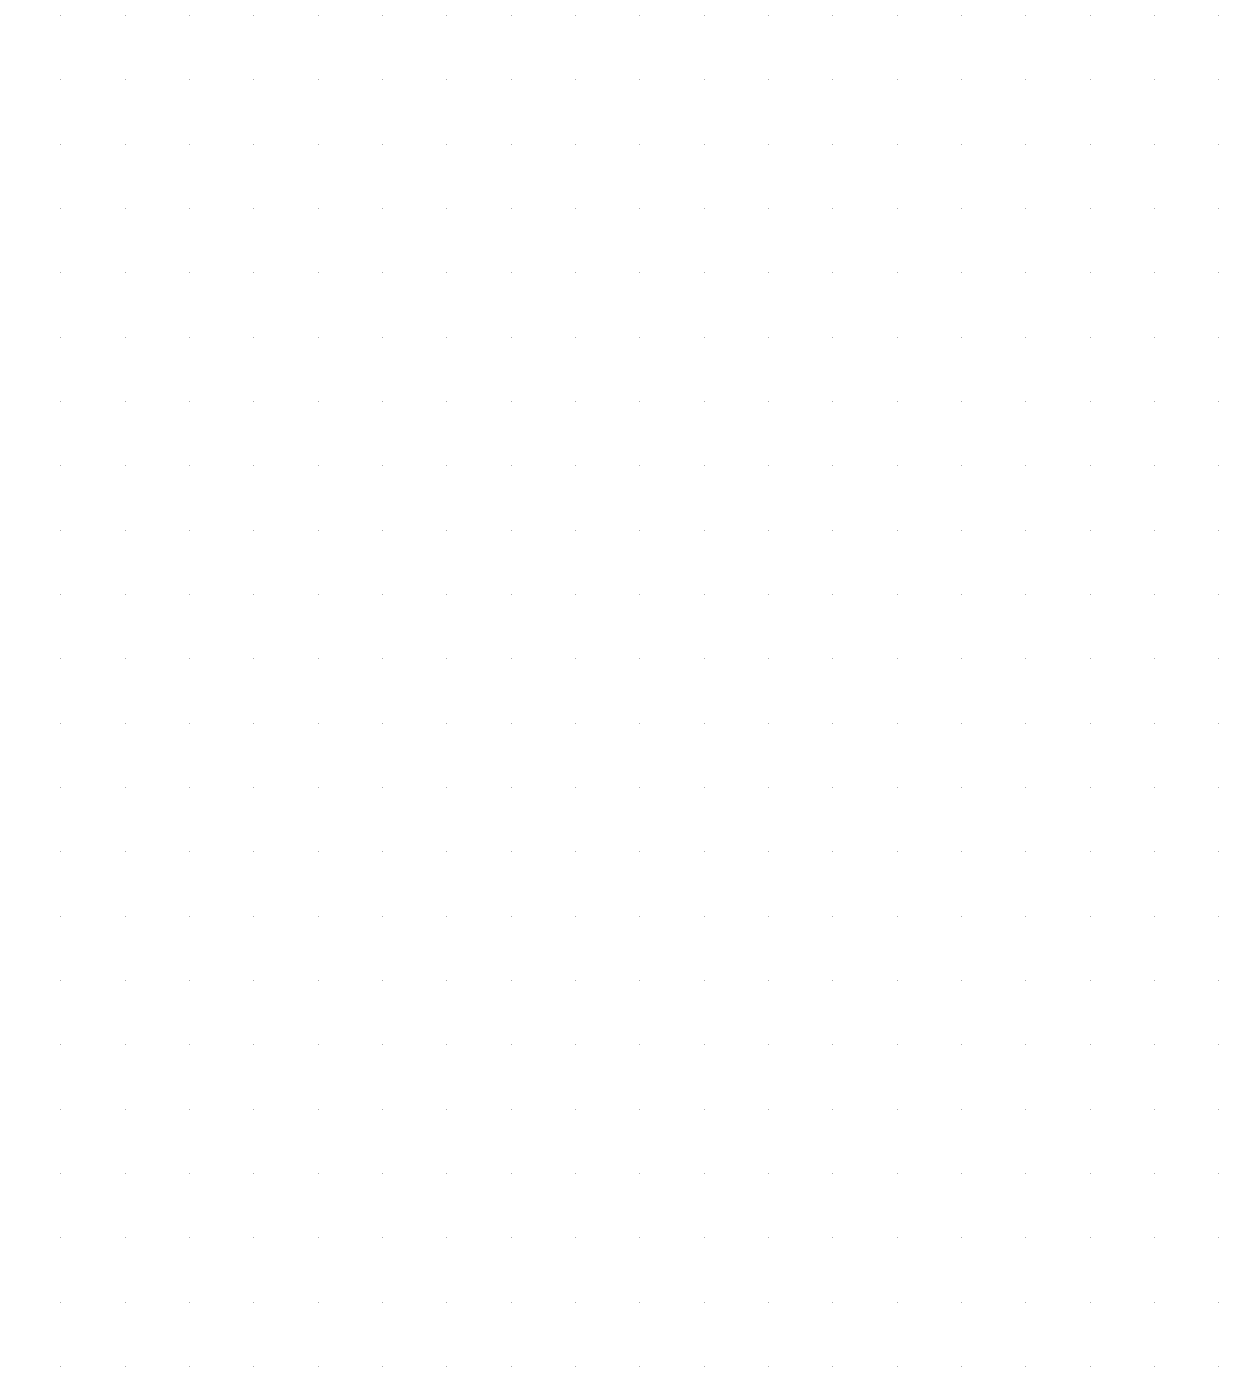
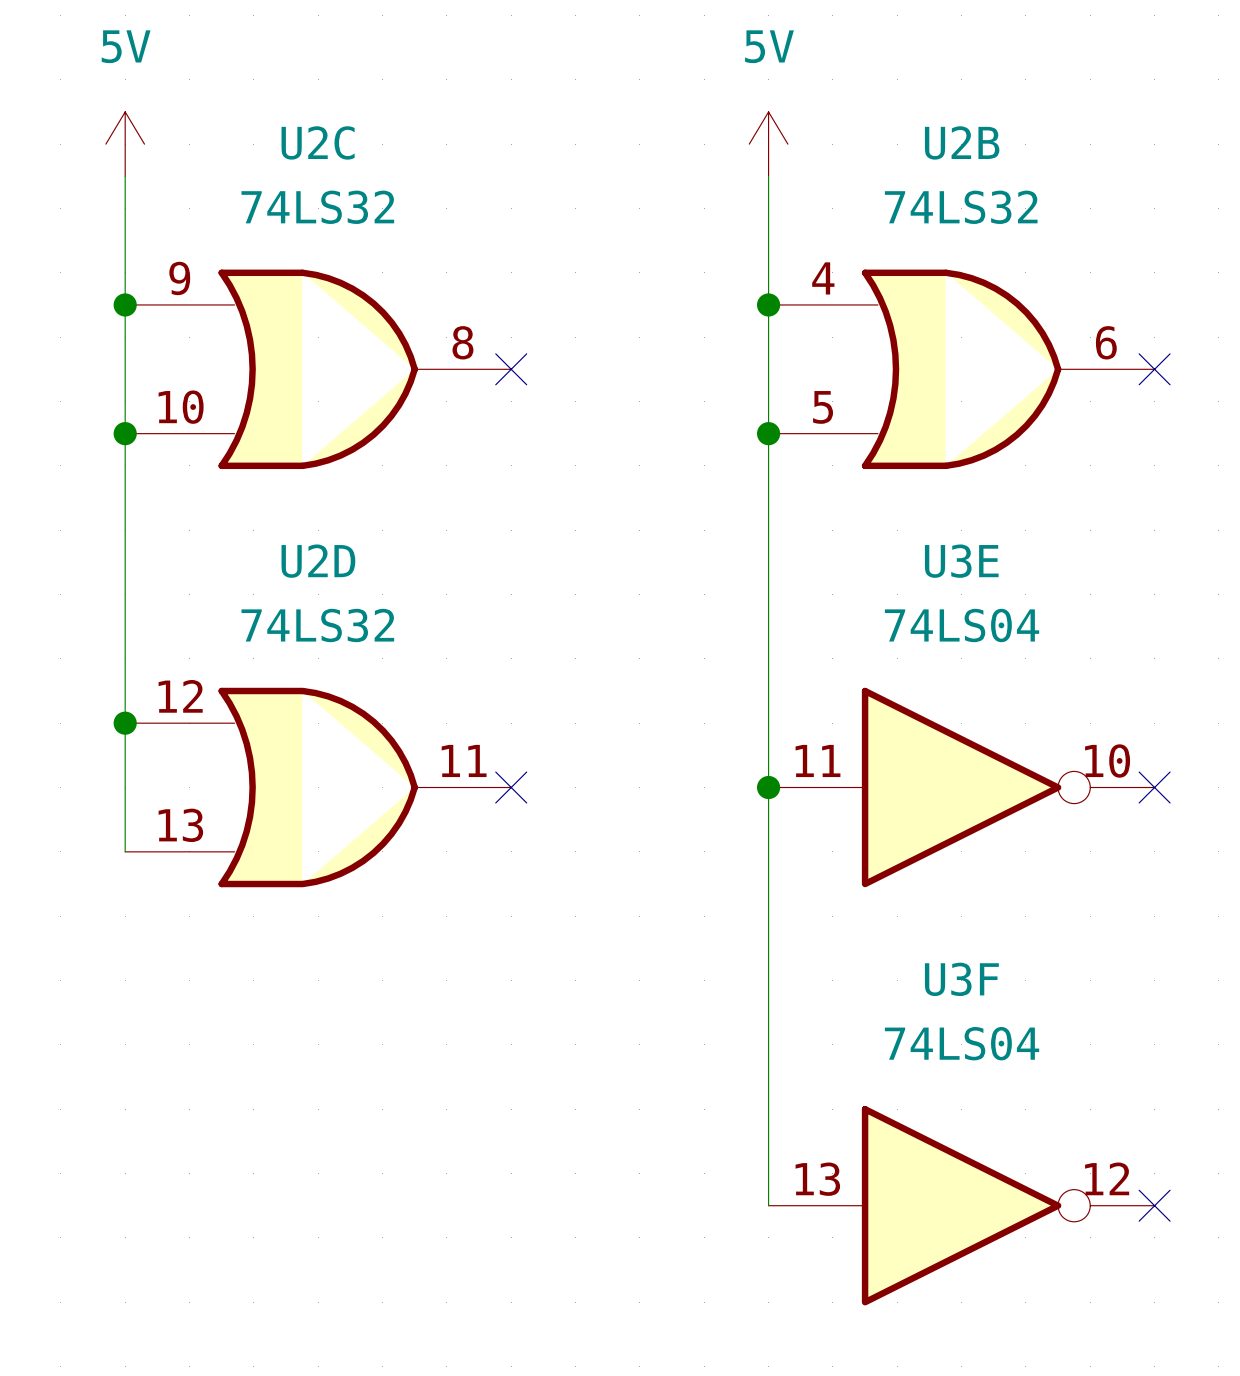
power symbol: none -> 5V (125, 144)
power symbol: none -> 5V (768, 144)
wire: none -> (125, 176) (125, 851)
wire: none -> (768, 176) (768, 1205)
junction: none -> (125, 304)
junction: none -> (768, 304)
U2C: none -> 74LS32 (318, 369)
no-connect mark: none -> (511, 369)
U2B: none -> 74LS32 (961, 369)
no-connect mark: none -> (1154, 369)
junction: none -> (125, 433)
junction: none -> (768, 433)
junction: none -> (125, 723)
U2D: none -> 74LS32 (318, 787)
no-connect mark: none -> (511, 787)
junction: none -> (768, 787)
U3E: none -> 74LS04 (961, 787)
no-connect mark: none -> (1154, 787)
U3F: none -> 74LS04 (961, 1205)
no-connect mark: none -> (1154, 1205)

